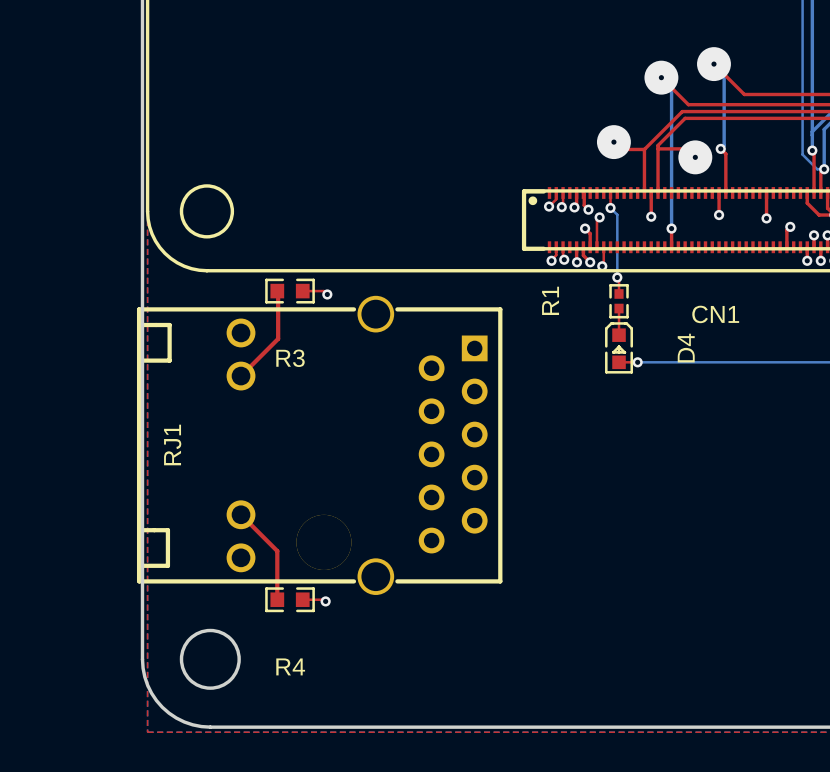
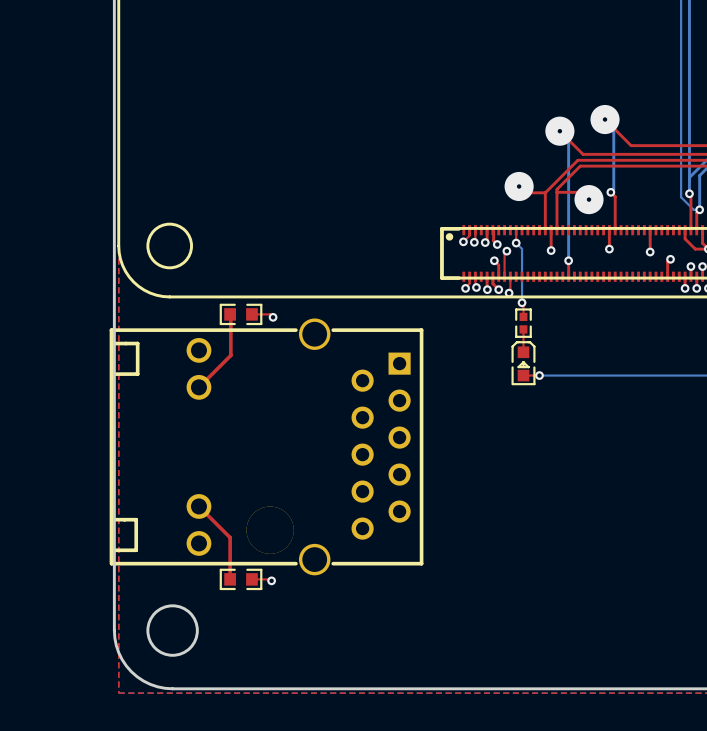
R1 name: R1 (550, 300) -> none
CN1 name: CN1 (715, 314) -> none
D4 name: D4 (686, 348) -> none
R3 name: R3 (290, 358) -> none
RJ1 name: RJ1 (172, 444) -> none
R4 name: R4 (290, 666) -> none

